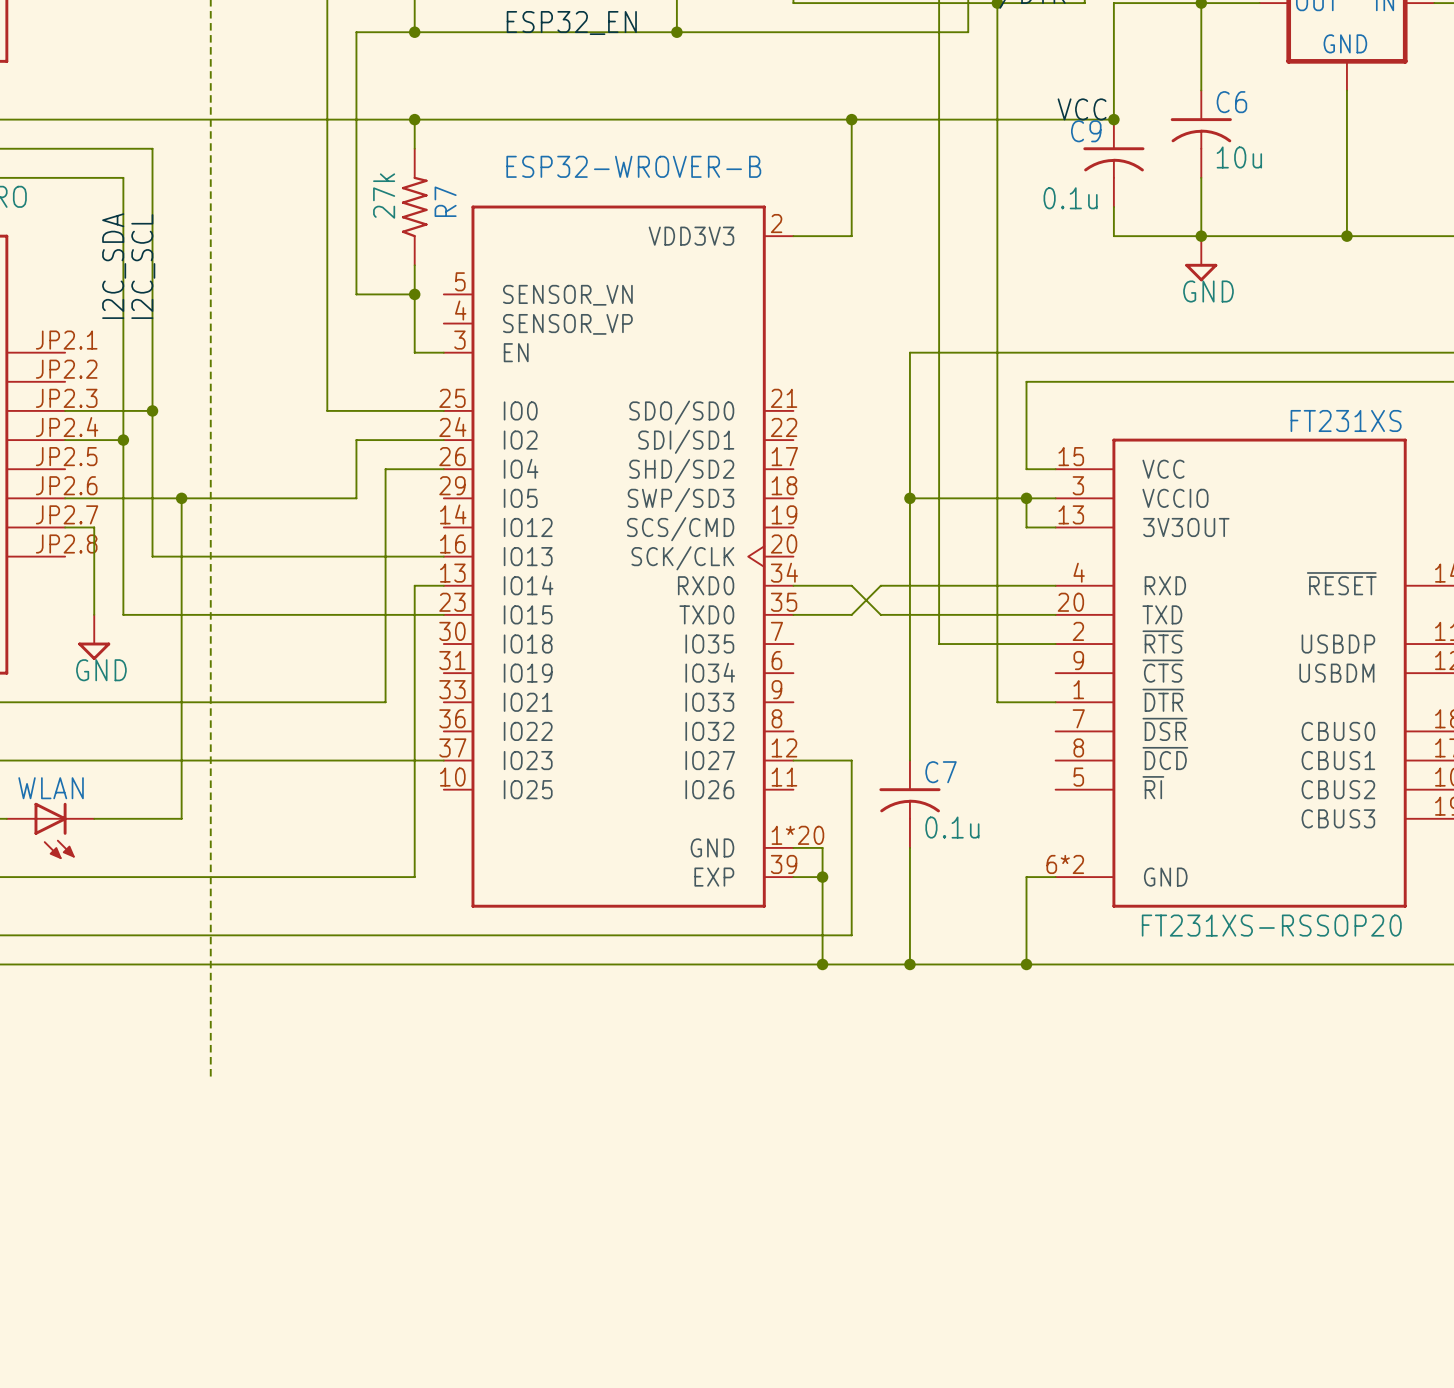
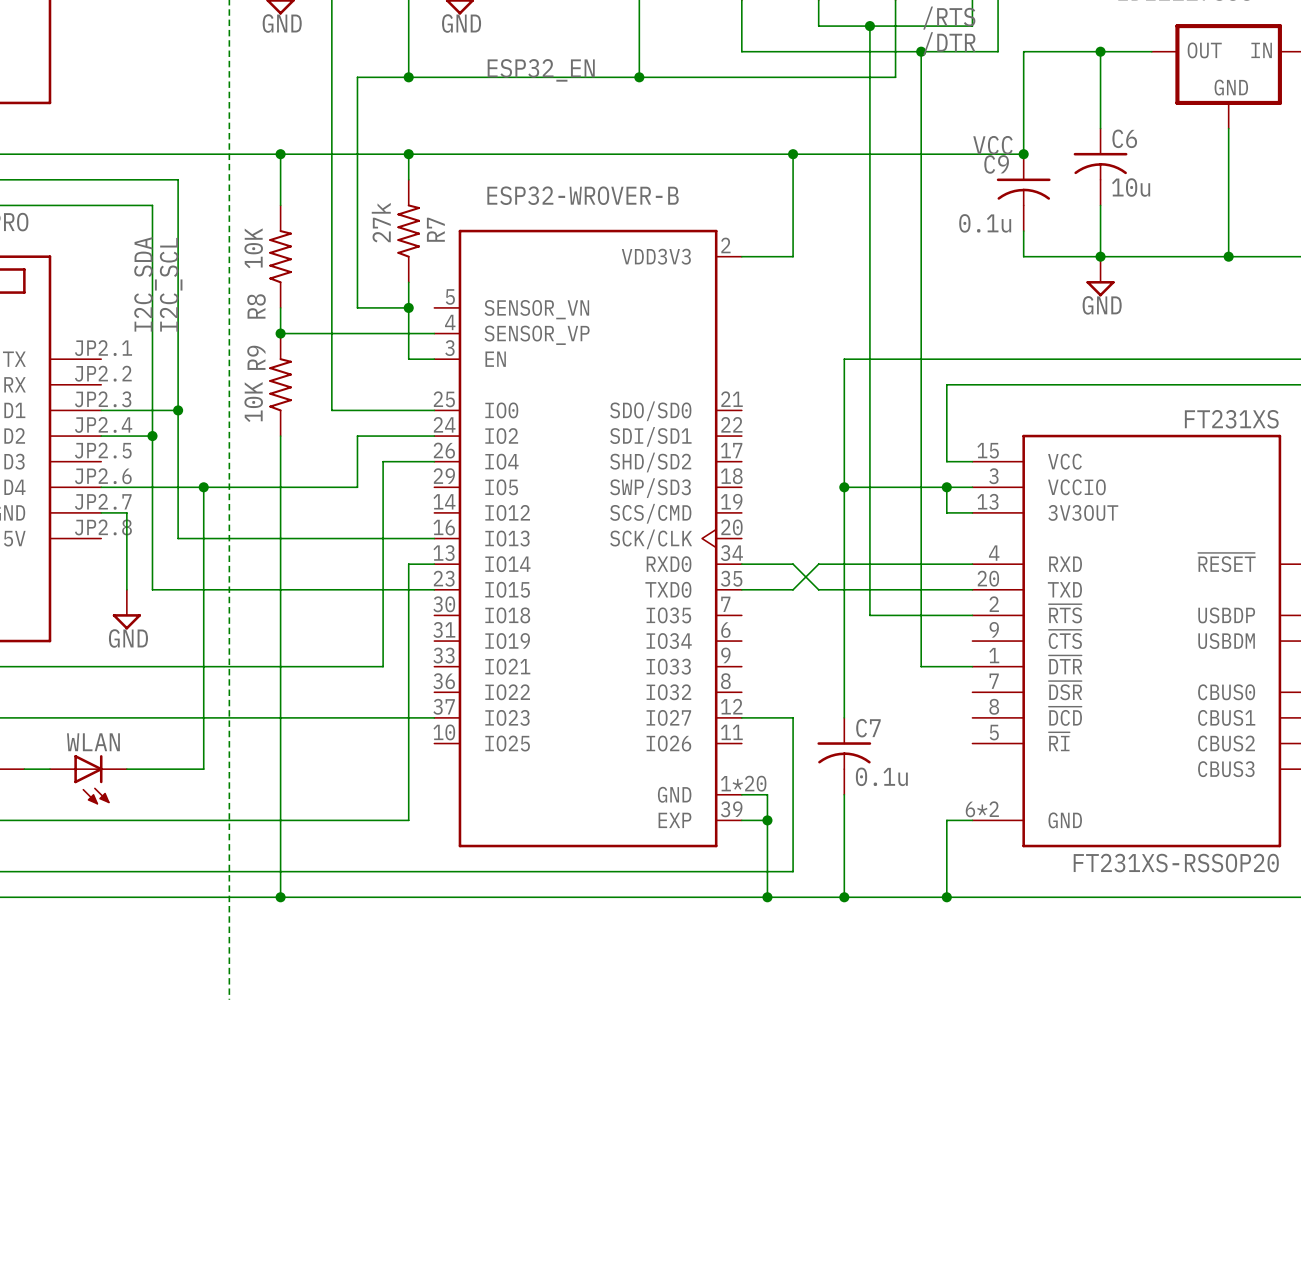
wire: none -> (280, 154) (280, 205)
junction: none -> (280, 154)
R8: none -> 10K (280, 256)
wire: none -> (280, 307) (280, 333) (434, 333)
junction: none -> (280, 333)
R9: none -> 10K (280, 384)
wire: none -> (280, 436) (280, 897)
junction: none -> (280, 897)

